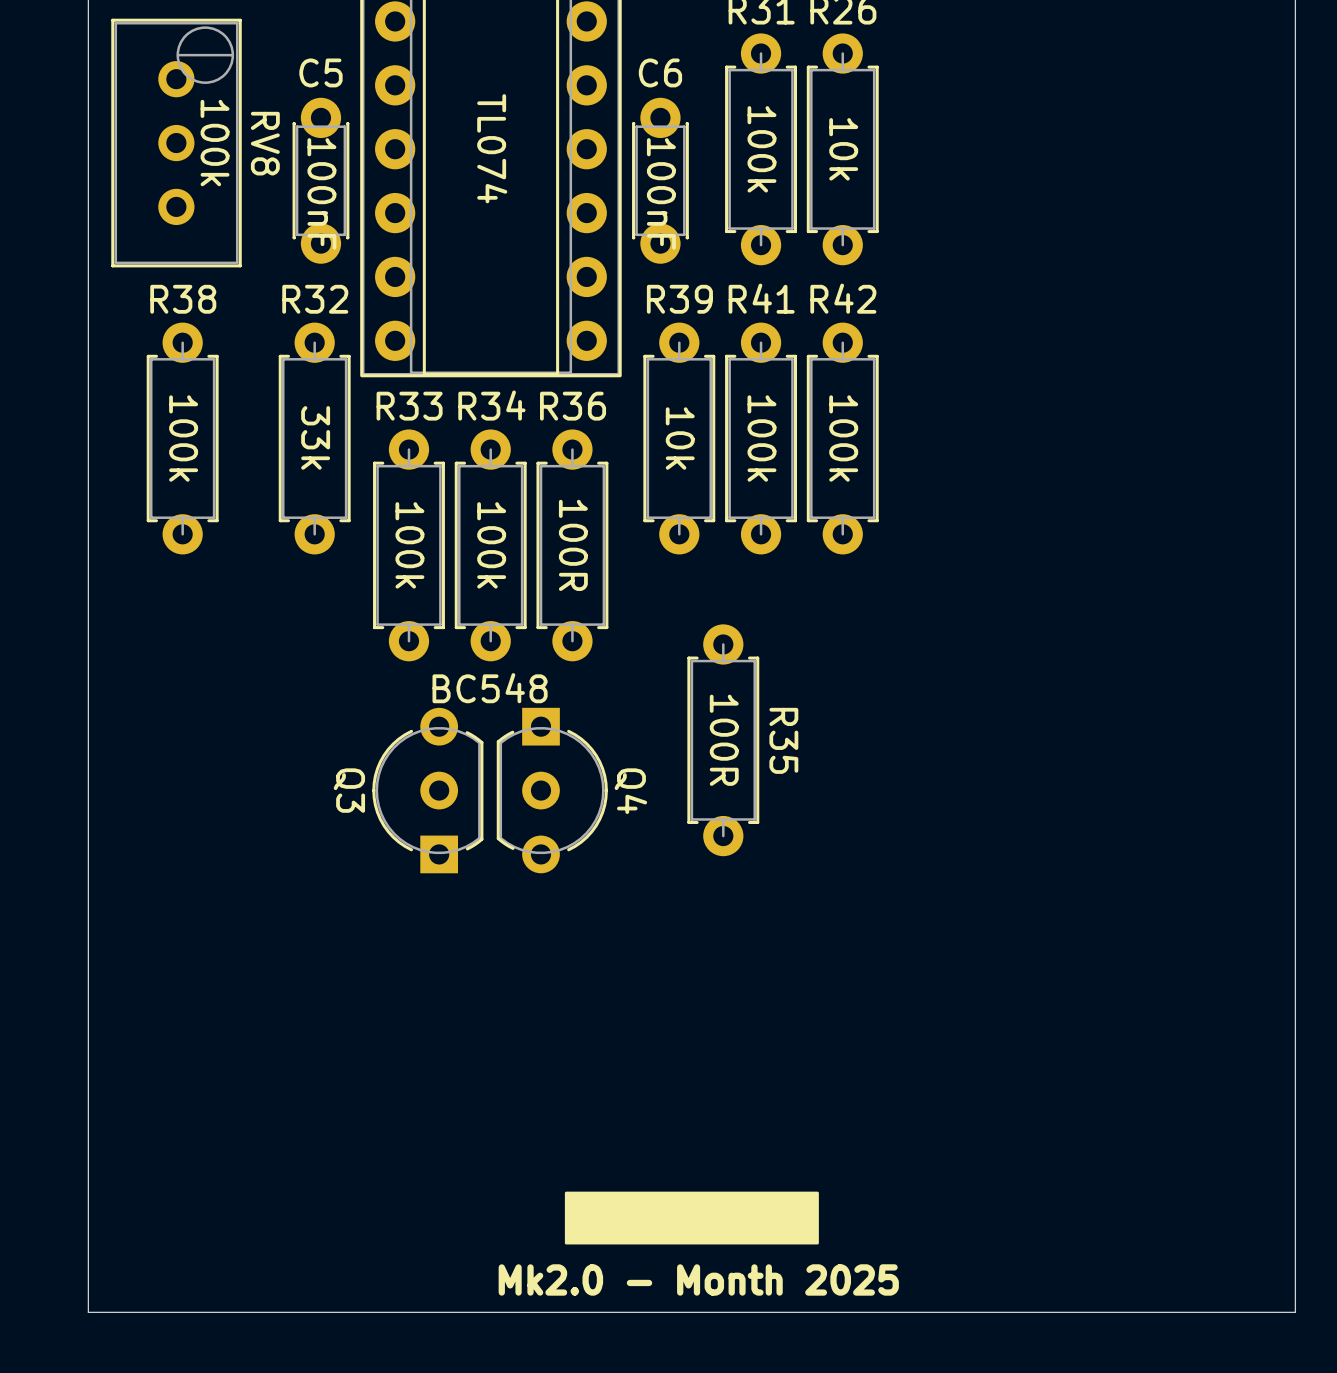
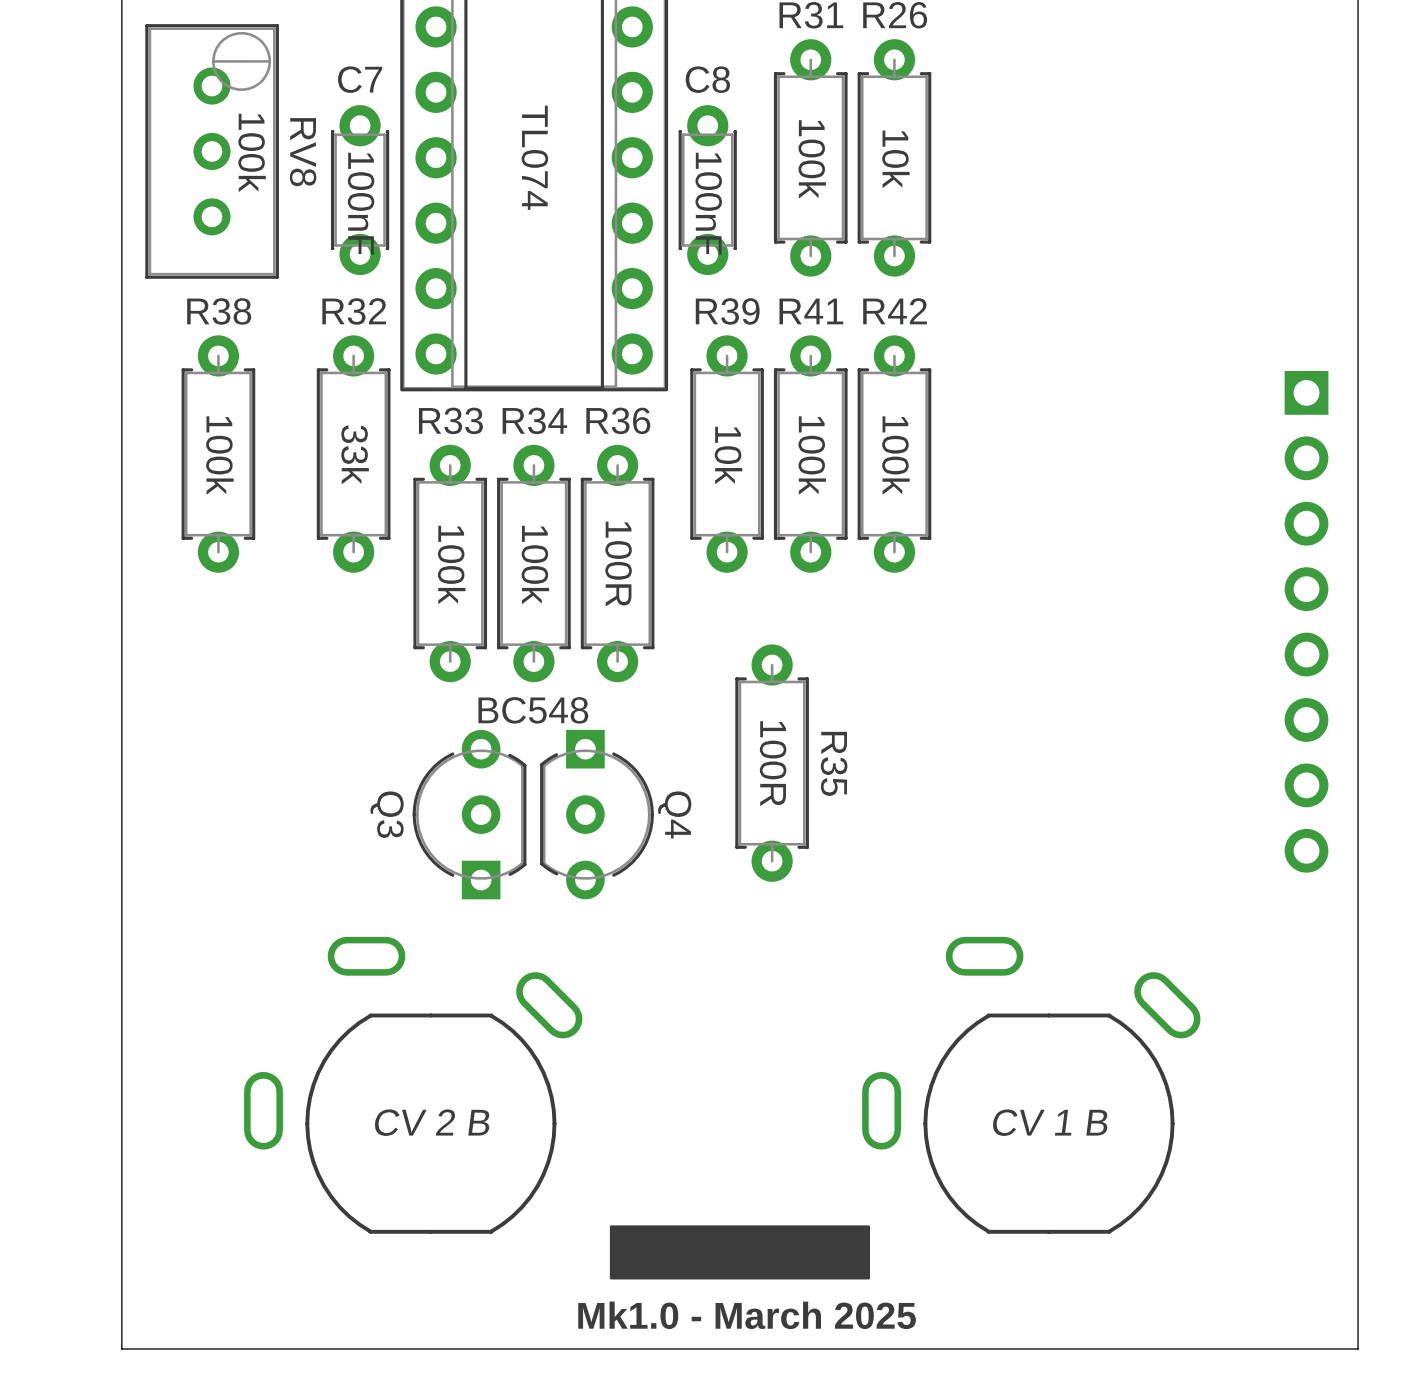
C5 name: C5 (320, 72) -> C7 (360, 79)
C6 name: C6 (660, 72) -> C8 (707, 79)
part: none -> (1306, 621)
part: none -> (413, 1085)
part: none -> (1031, 1085)
text: Mk2.0 - Month 2025 (698, 1279) -> Mk1.0 - March 2025 (747, 1315)

